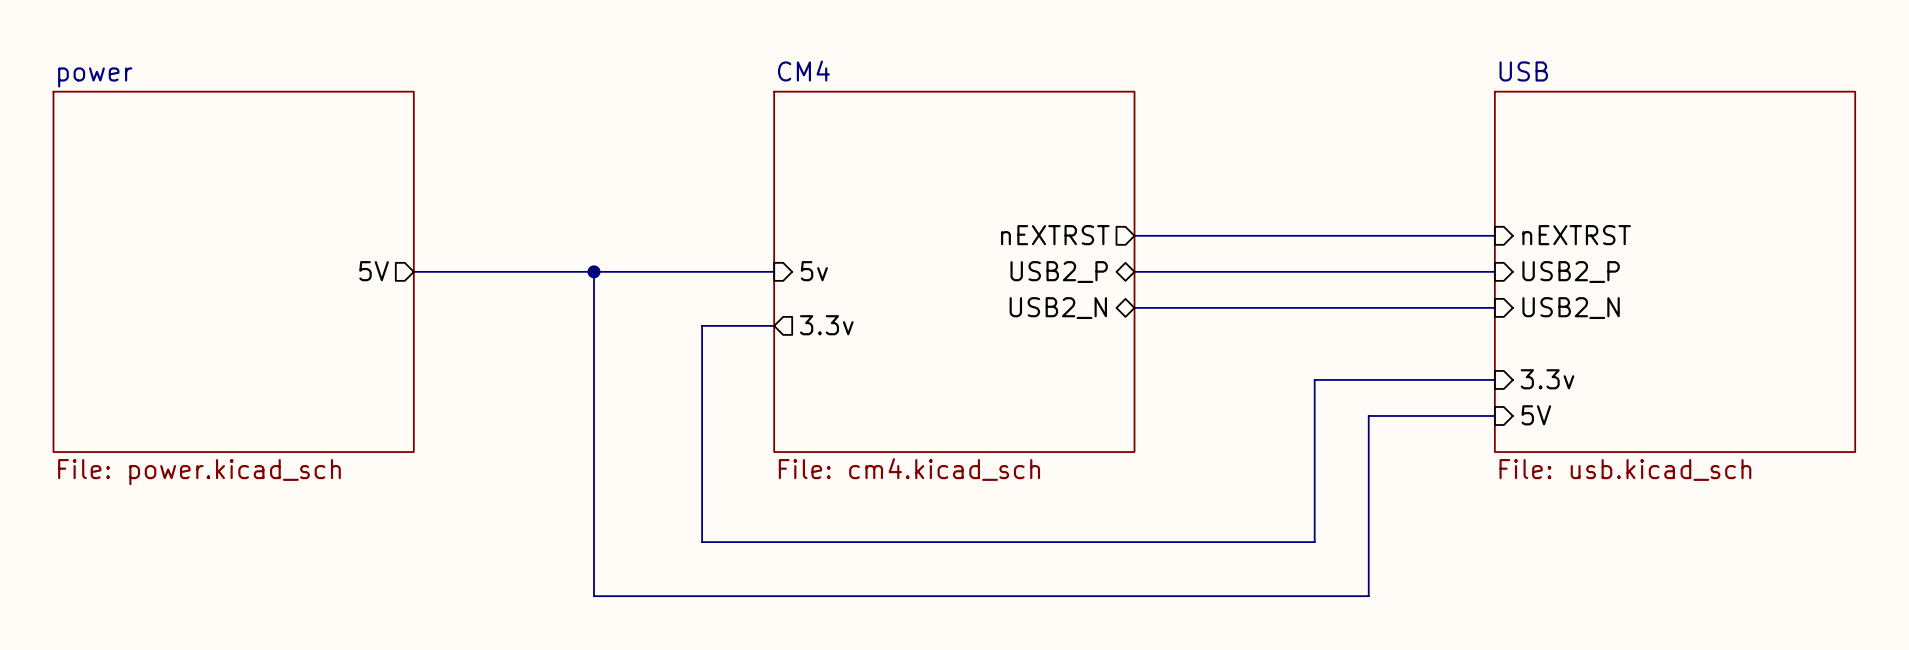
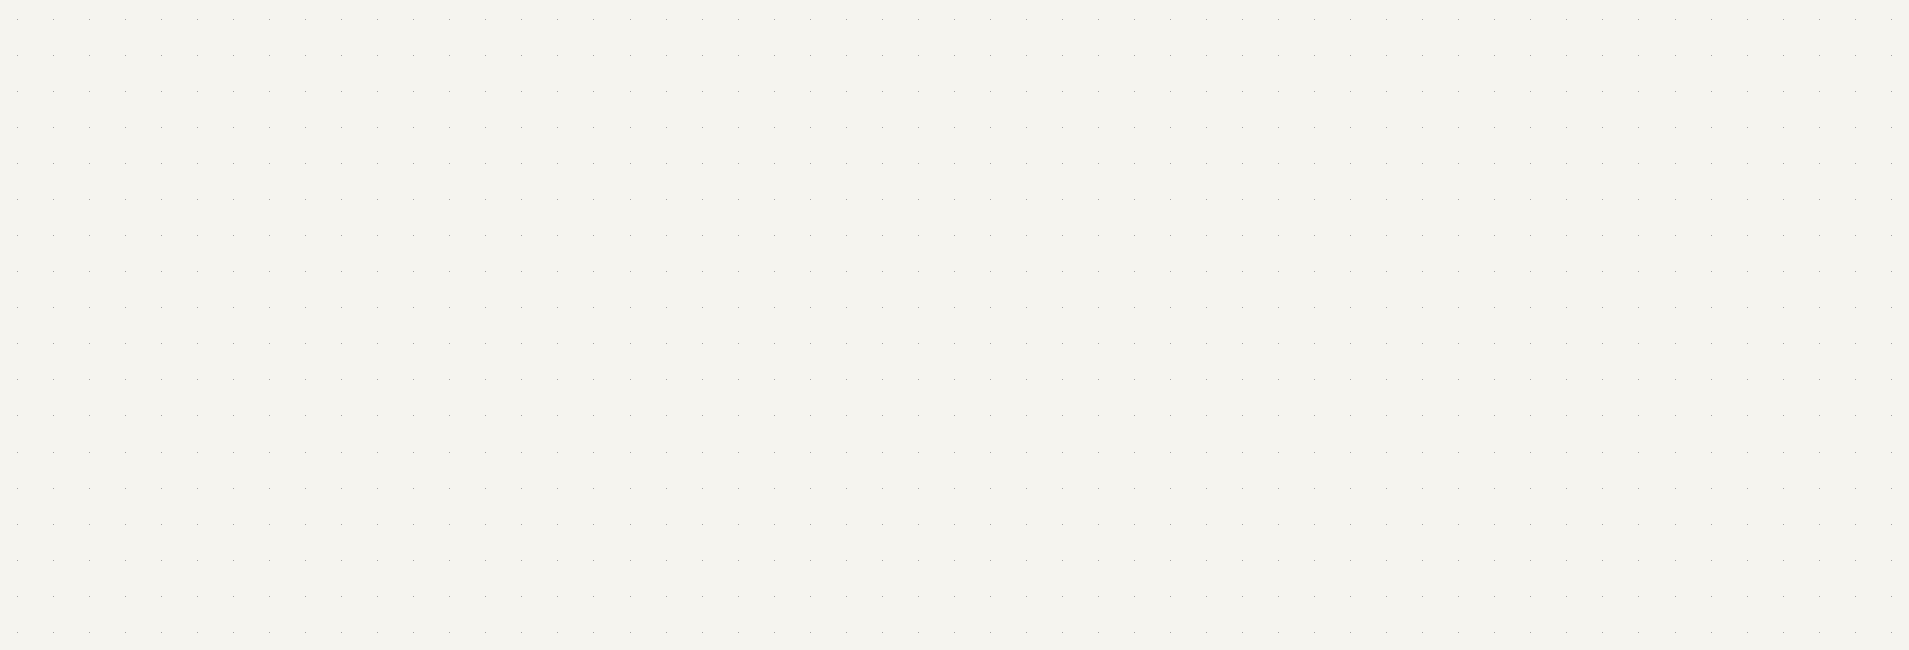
sheet pin: nEXTRST (1055, 235) -> none
wire: (1134, 235) (1494, 235) -> none
sheet pin: nEXTRST (1576, 235) -> none
sheet power: File: power.kicad_sch (233, 271) -> none
sheet pin: 5V (374, 271) -> none
wire: (413, 271) (774, 271) -> none
wire: (593, 271) (593, 596) (1368, 596) (1368, 415) (1494, 415) -> none
junction: (593, 271) -> none
sheet pin: 5v (814, 271) -> none
sheet CM4: File: cm4.kicad_sch (954, 271) -> none
wire: (1134, 271) (1494, 271) -> none
sheet USB: File: usb.kicad_sch (1675, 271) -> none
sheet pin: USB2_P (1059, 272) -> none
sheet pin: USB2_P (1571, 272) -> none
wire: (1134, 307) (1494, 307) -> none
sheet pin: USB2_N (1058, 308) -> none
sheet pin: USB2_N (1571, 308) -> none
wire: (774, 325) (702, 325) (702, 542) (1314, 542) (1314, 379) (1494, 379) -> none
sheet pin: 3.3v (826, 325) -> none
sheet pin: 3.3v (1547, 379) -> none
sheet pin: 5V (1536, 415) -> none

